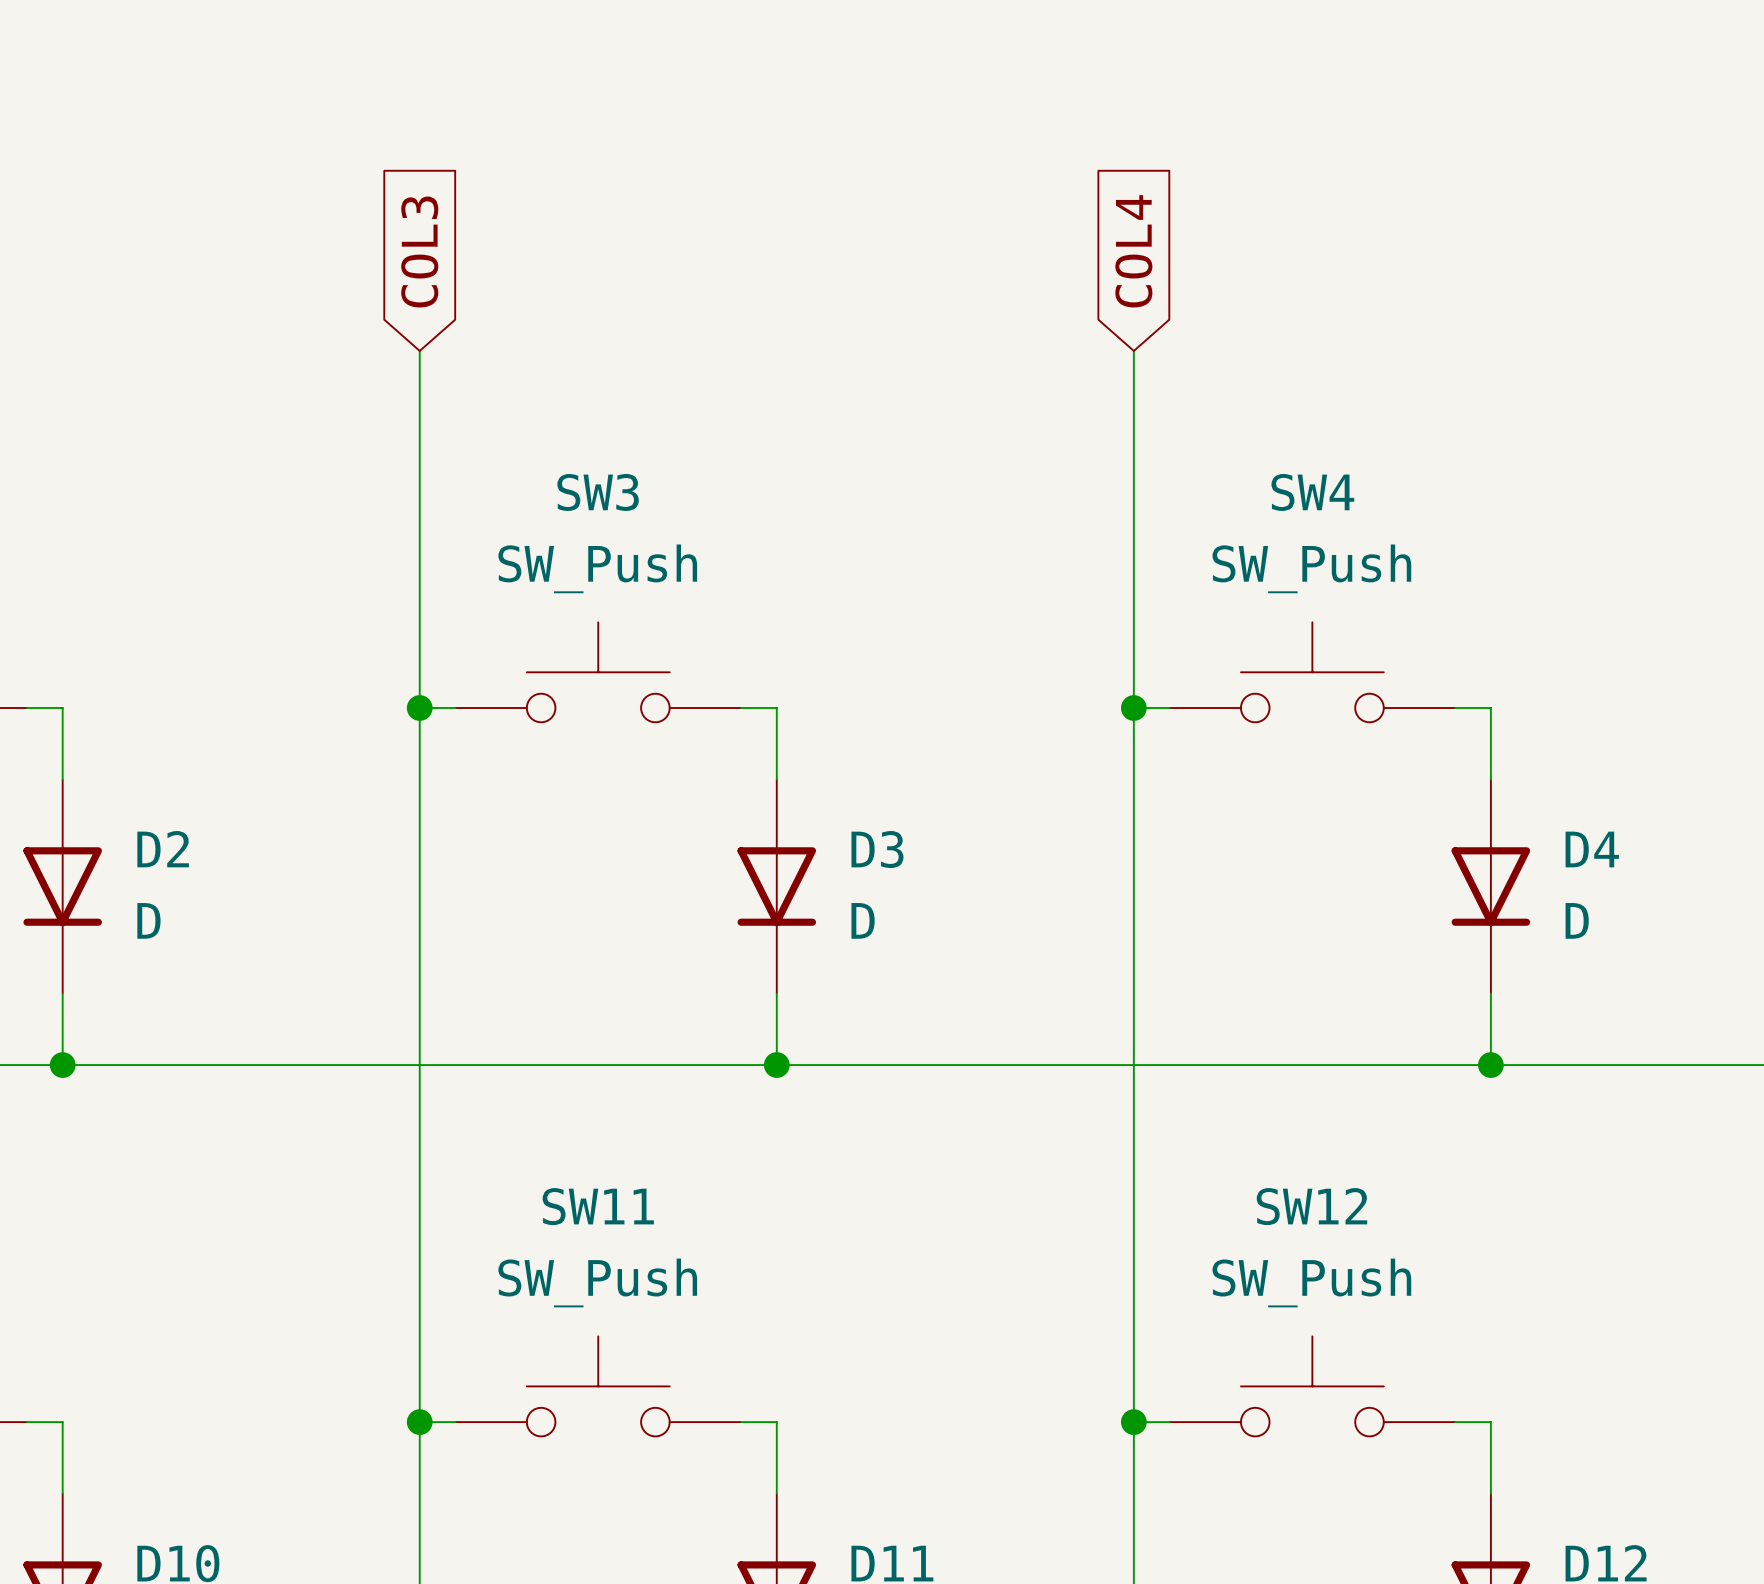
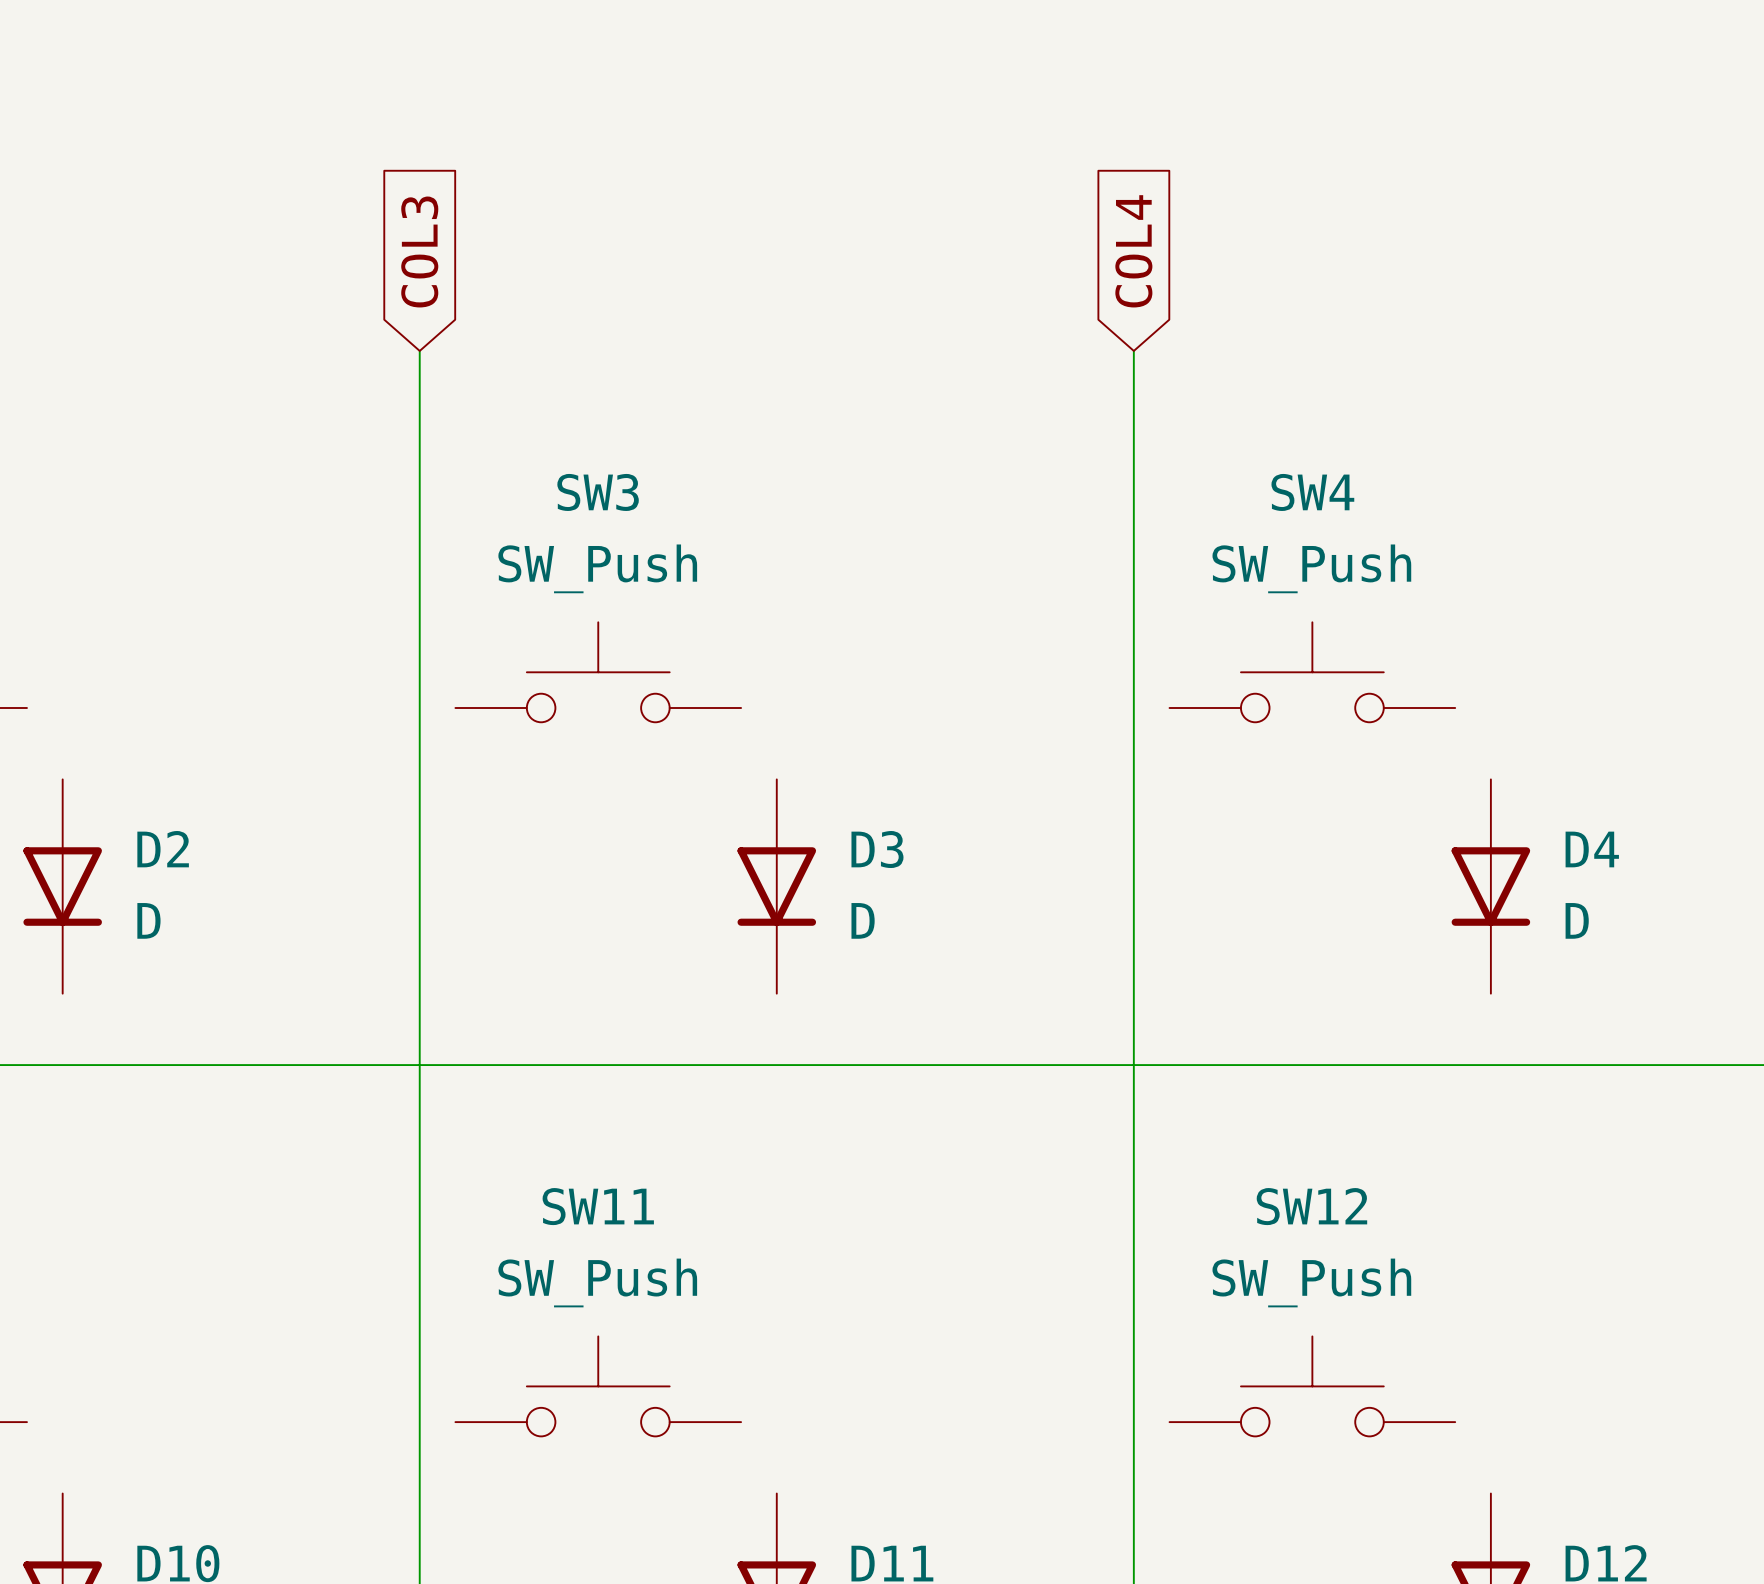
wire: (26, 708) (62, 708) (62, 779) -> none
wire: (419, 708) (455, 708) -> none
junction: (419, 708) -> none
wire: (741, 708) (776, 708) (776, 779) -> none
wire: (1133, 708) (1169, 708) -> none
junction: (1133, 708) -> none
wire: (1455, 708) (1490, 708) (1490, 779) -> none
wire: (62, 993) (62, 1065) -> none
wire: (776, 993) (776, 1065) -> none
wire: (1490, 993) (1490, 1065) -> none
junction: (62, 1065) -> none
junction: (776, 1065) -> none
junction: (1490, 1065) -> none
wire: (26, 1422) (62, 1422) (62, 1493) -> none
wire: (419, 1422) (455, 1422) -> none
junction: (419, 1422) -> none
wire: (741, 1422) (776, 1422) (776, 1493) -> none
wire: (1133, 1422) (1169, 1422) -> none
junction: (1133, 1422) -> none
wire: (1455, 1422) (1490, 1422) (1490, 1493) -> none

